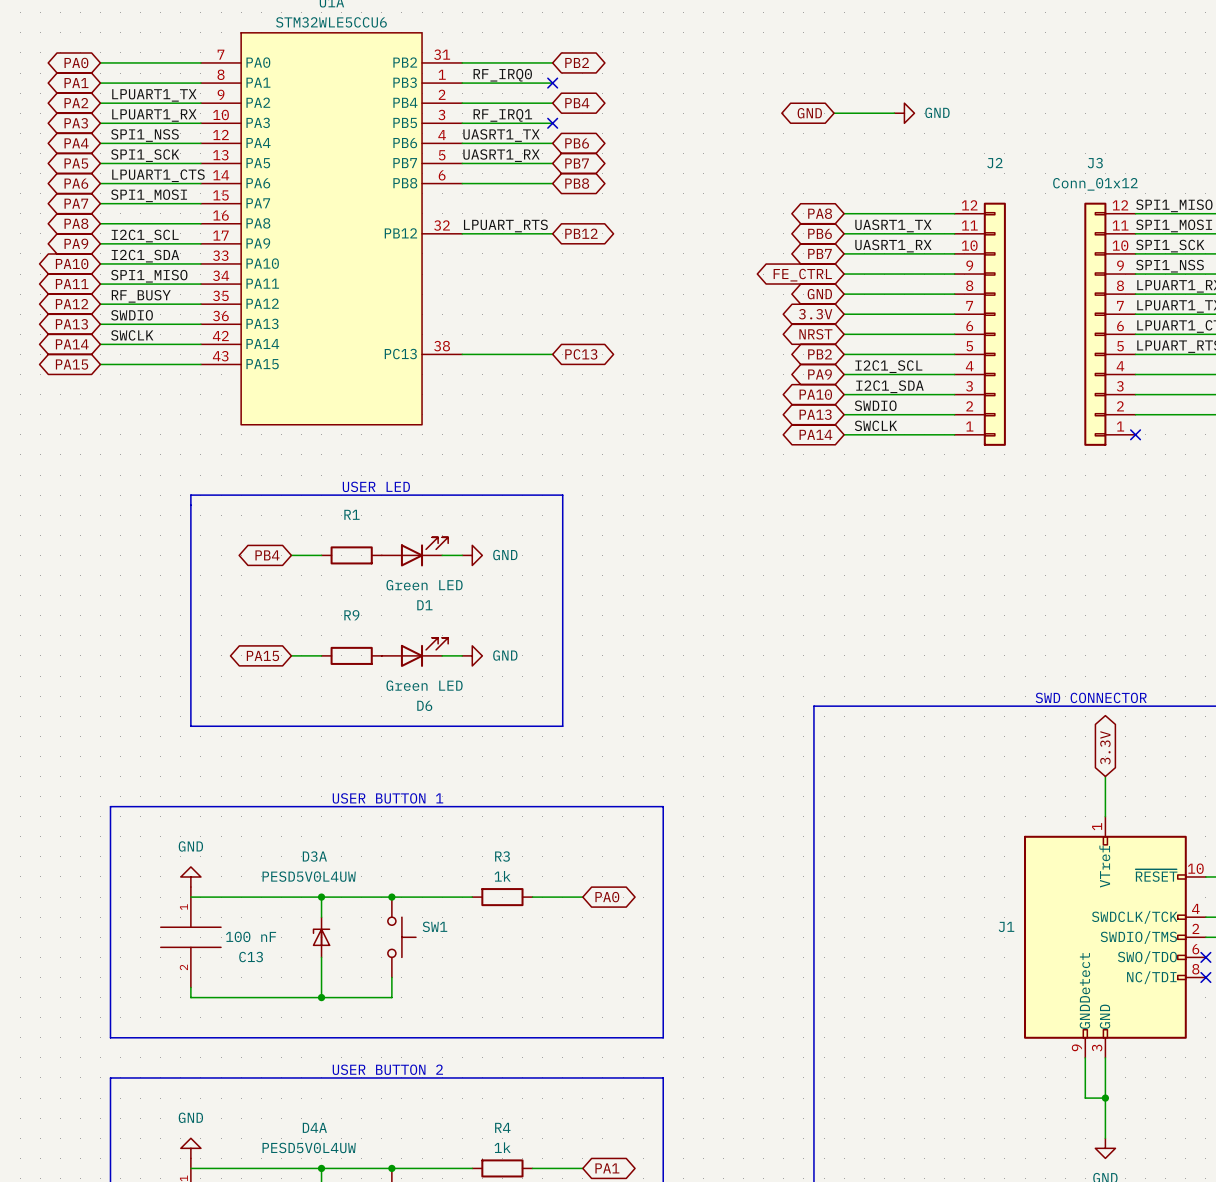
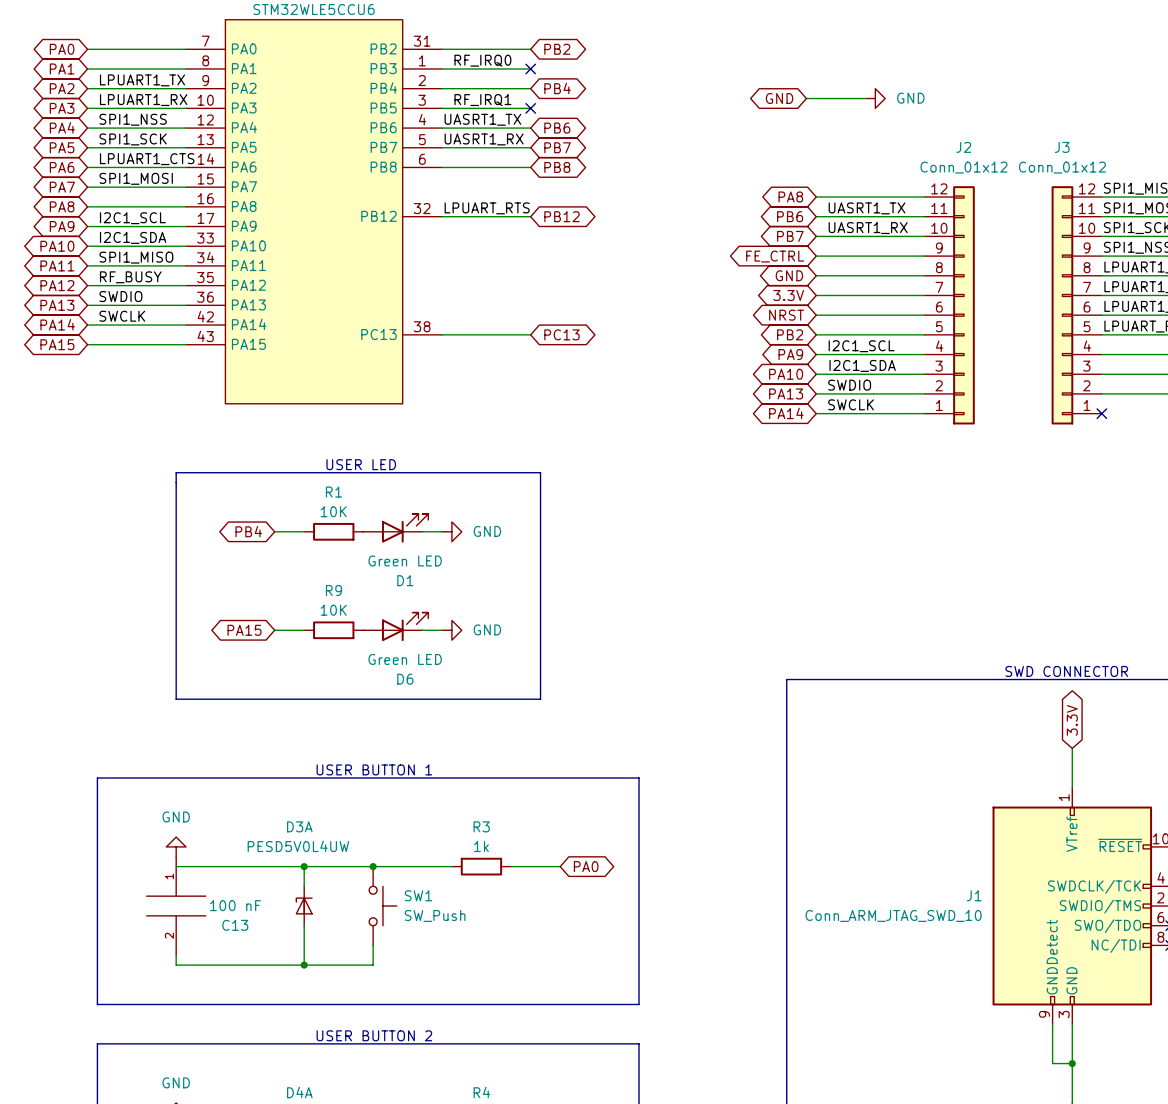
J2 value: none -> Conn_01x12 (963, 167)
R1 value: none -> 10K (333, 511)
R9 value: none -> 10K (333, 610)
SW1 value: none -> SW_Push (435, 915)
J1 value: none -> Conn_ARM_JTAG_SWD_10 (893, 915)

